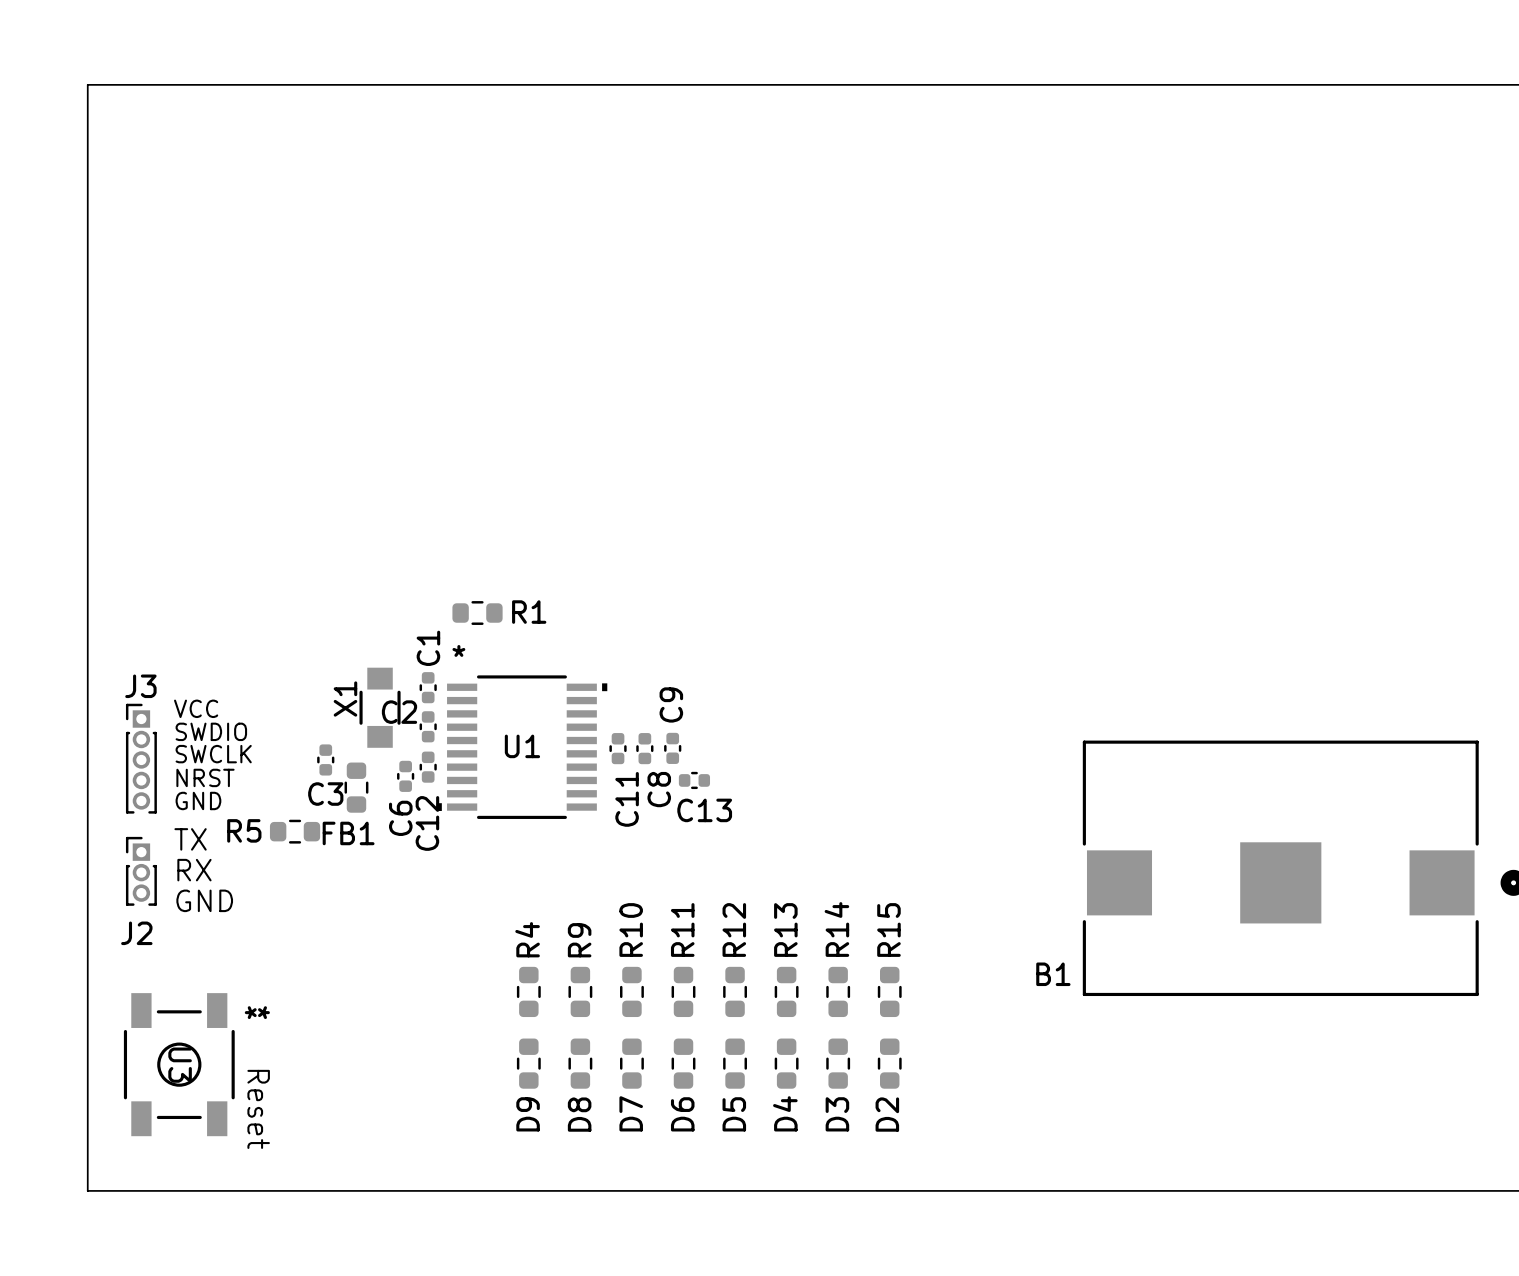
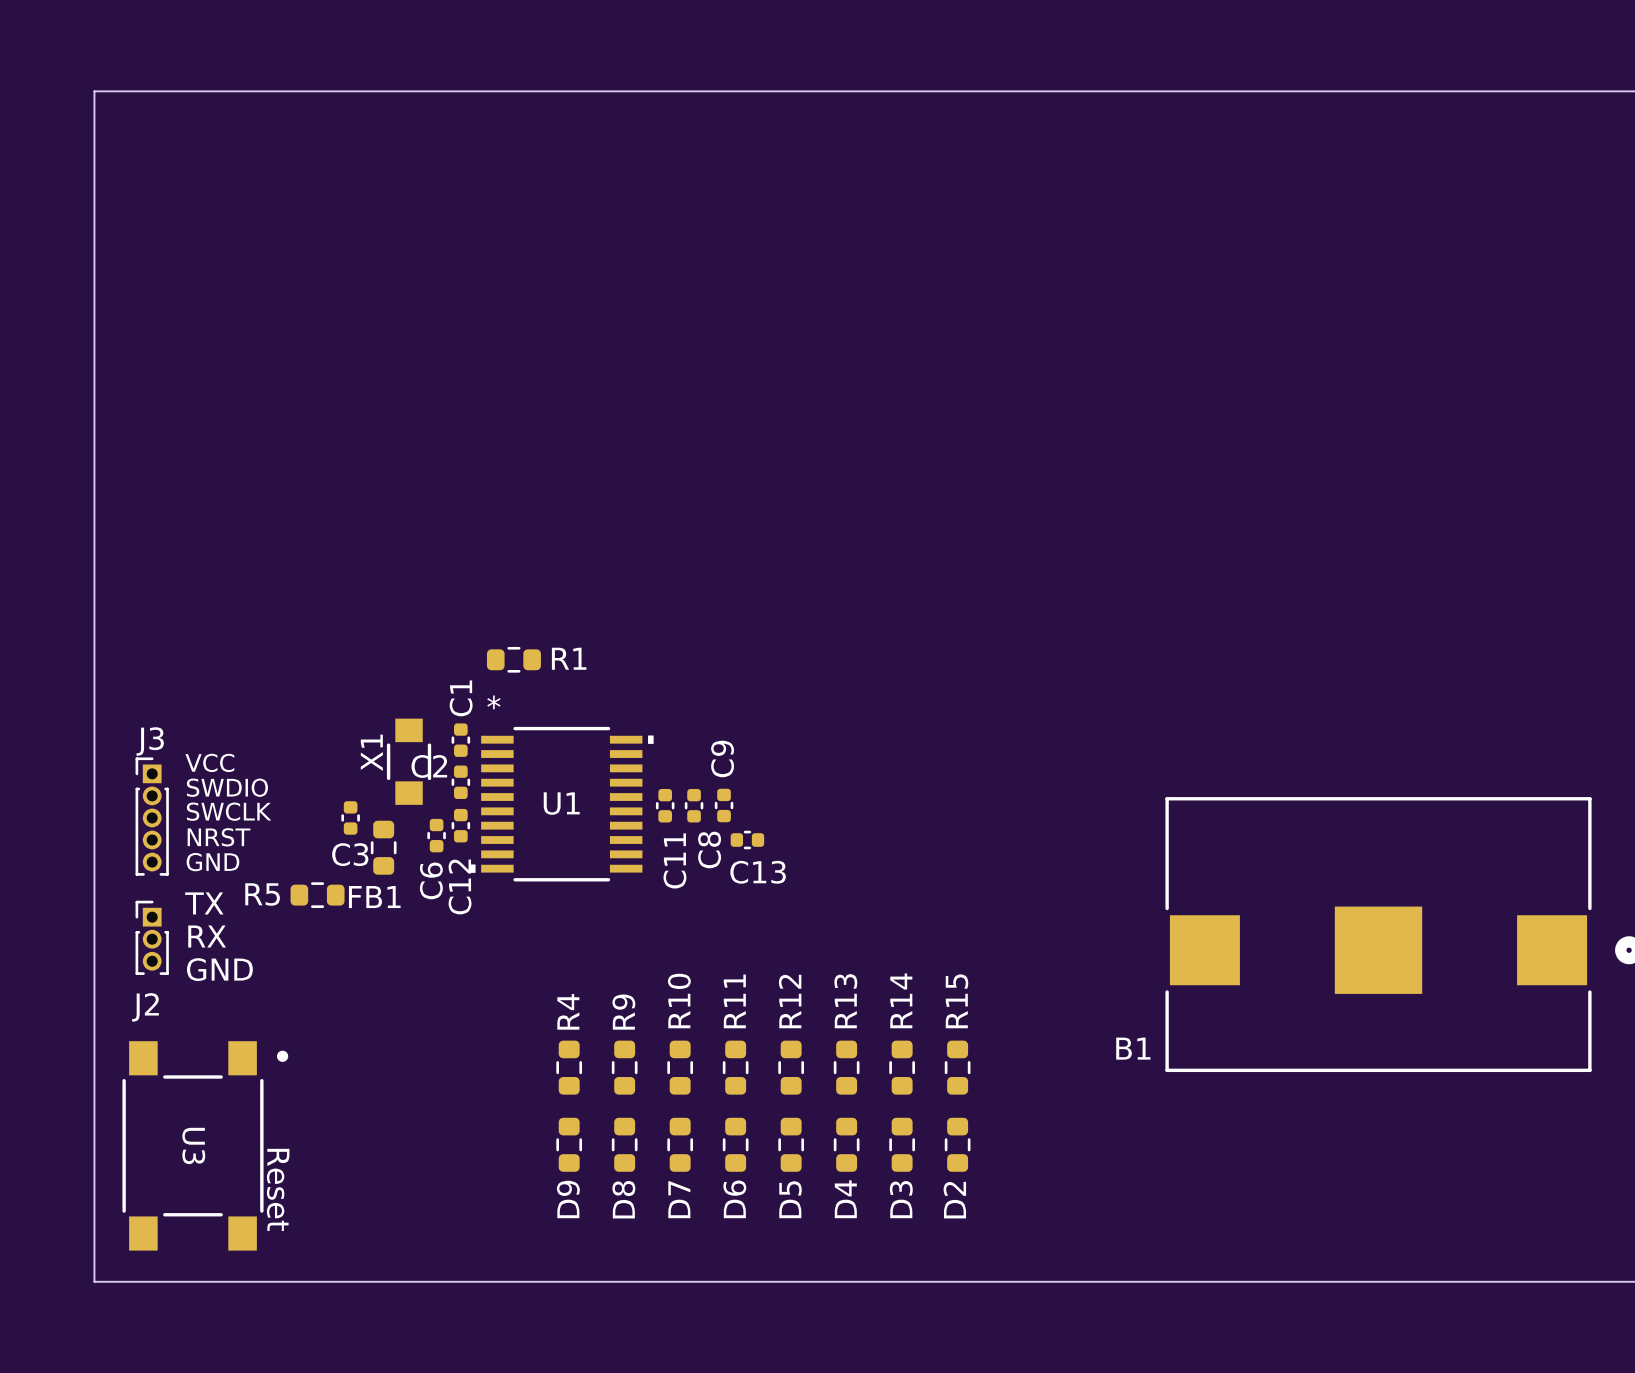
U3 footprint: [123, 993, 235, 1137] -> [122, 1041, 289, 1251]

